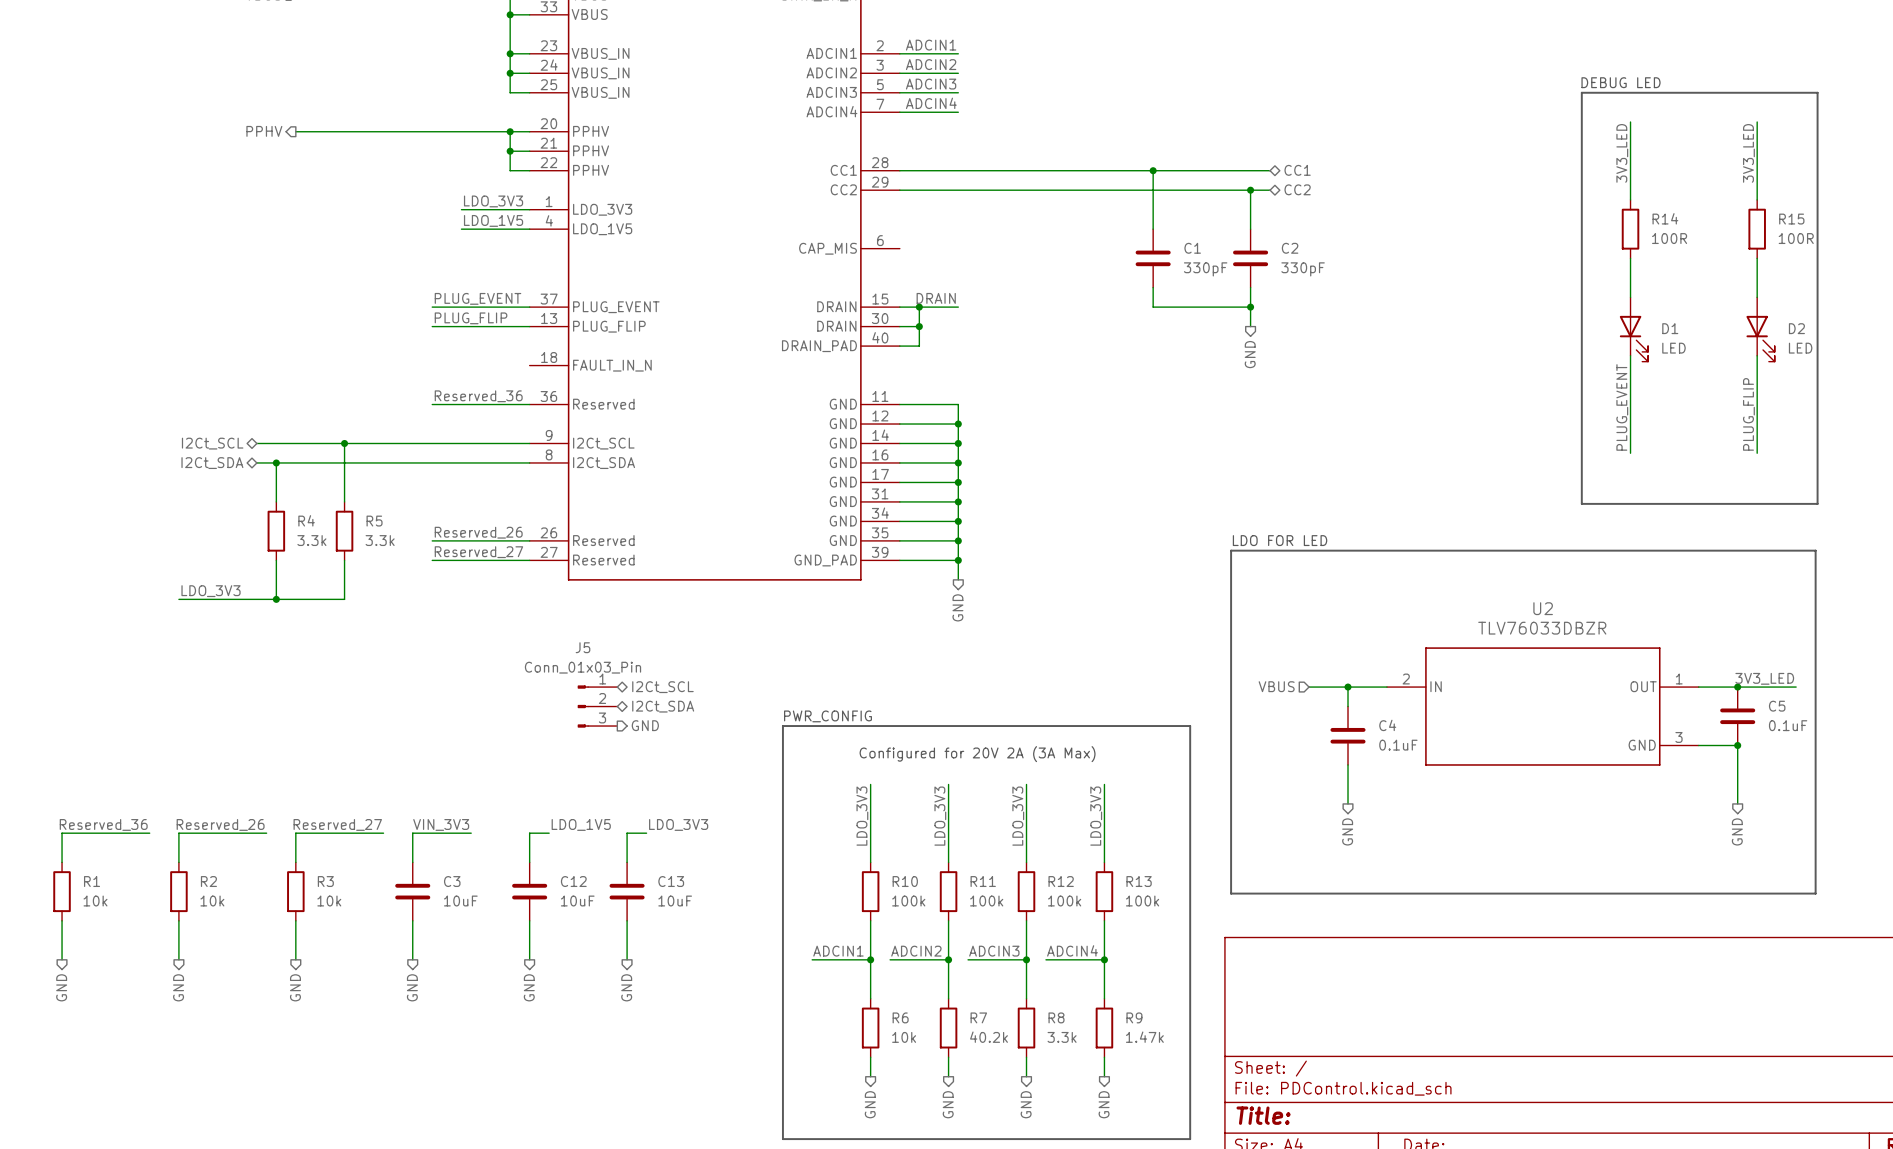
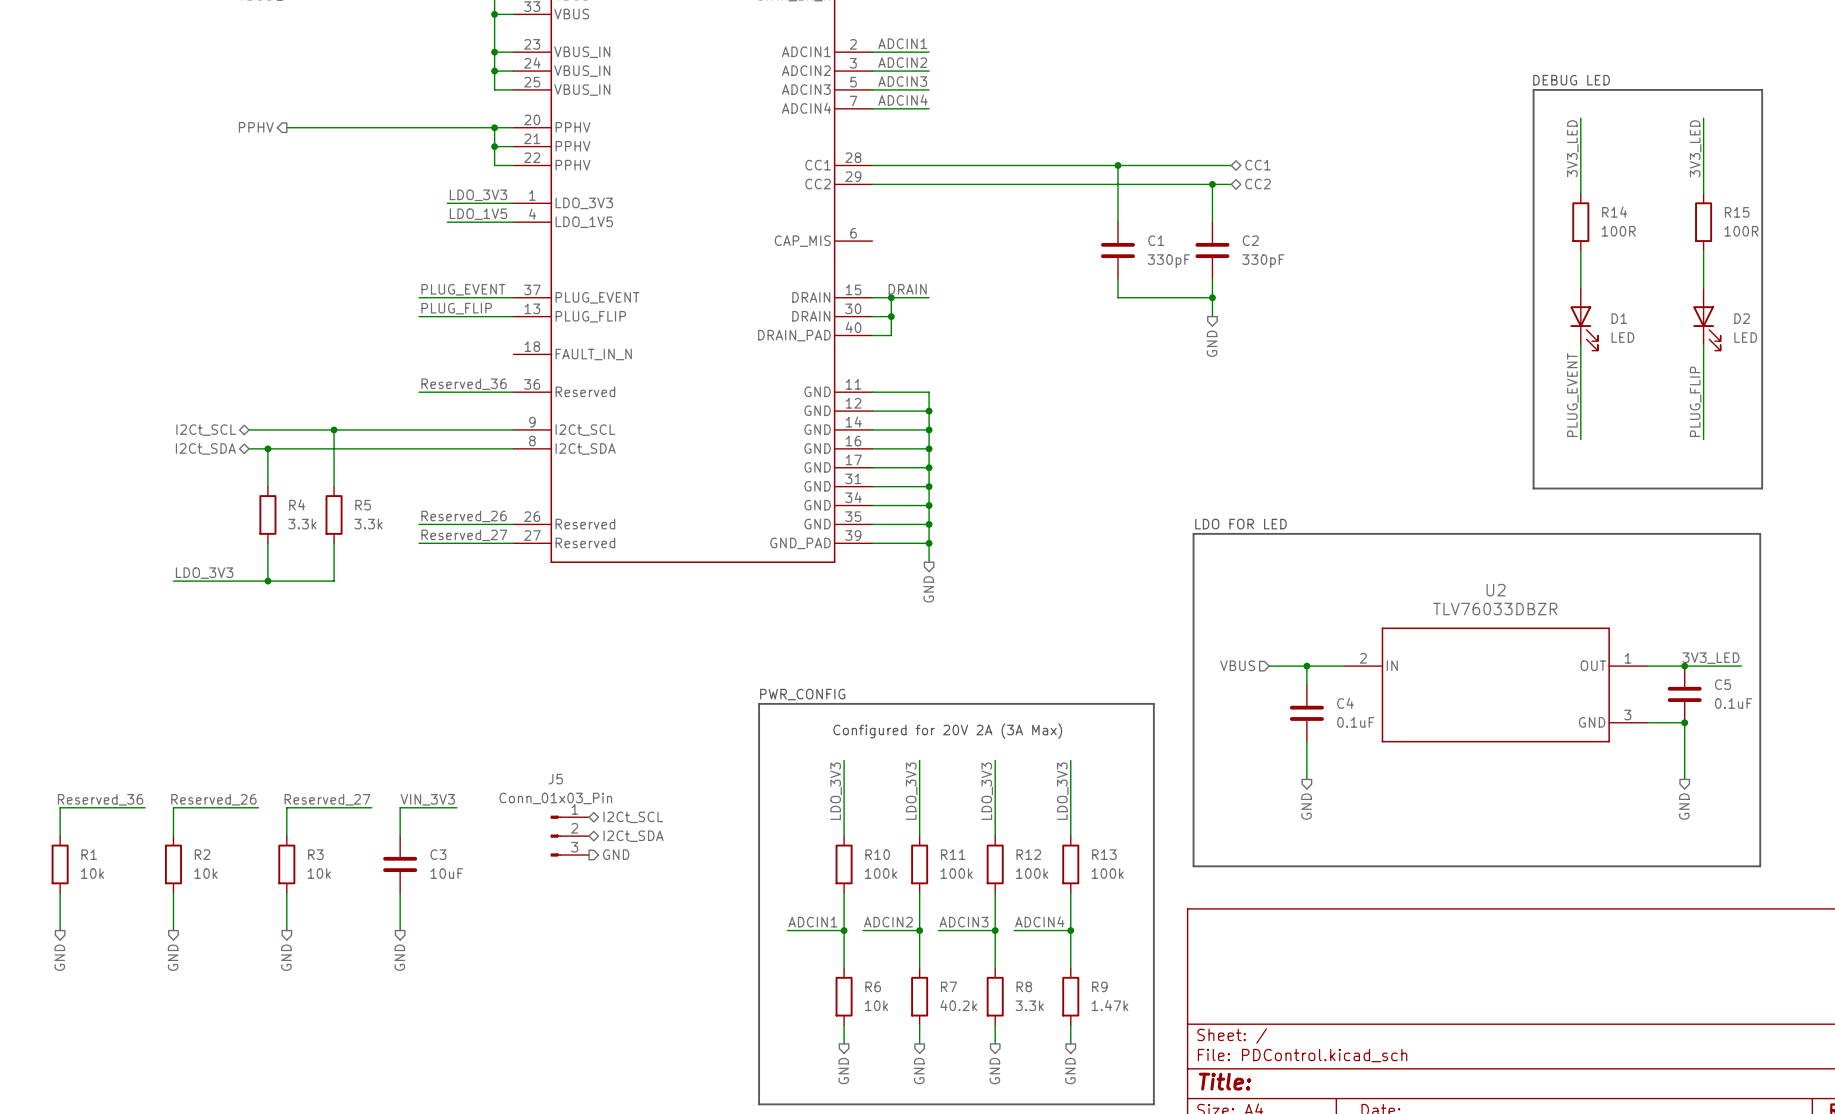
hierarchical label position: I2Ct_SCL (662, 687) -> I2Ct_SCL (633, 817)
J5 position: (597, 706) -> (569, 836)
hierarchical label position: I2Ct_SDA (663, 706) -> I2Ct_SDA (633, 836)
hierarchical label: GND (645, 725) -> none
label: LDO_1V5 (581, 824) -> none
label: LDO_3V3 (678, 824) -> none
wire: (549, 833) (529, 833) (529, 862) -> none
wire: (646, 833) (627, 833) (627, 862) -> none
hierarchical label: none -> GND (616, 854)
C12: 10uF (529, 891) -> none
C13: 10uF (627, 891) -> none
wire: (529, 920) (529, 959) -> none
wire: (627, 920) (627, 959) -> none
hierarchical label: GND (529, 987) -> none
hierarchical label: GND (626, 987) -> none

